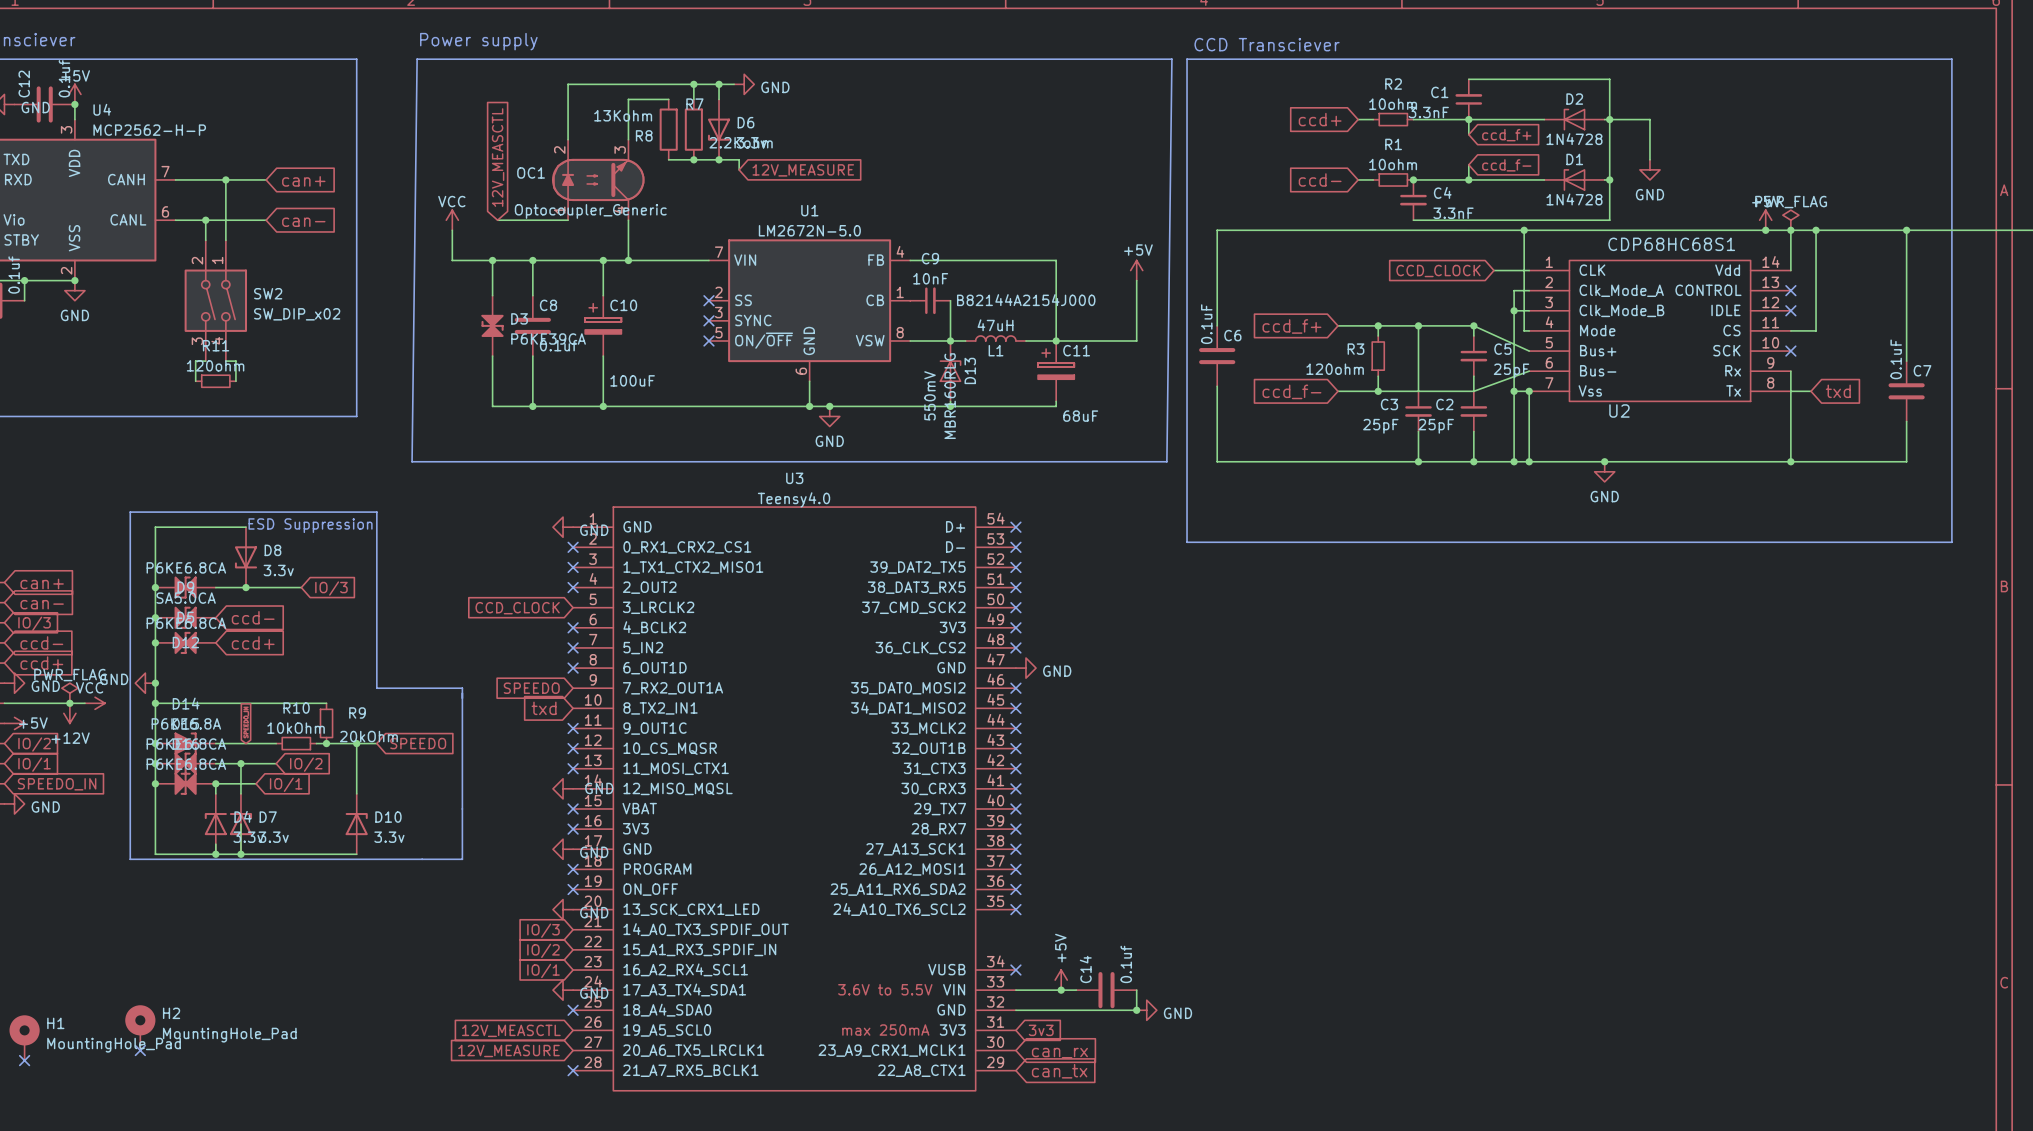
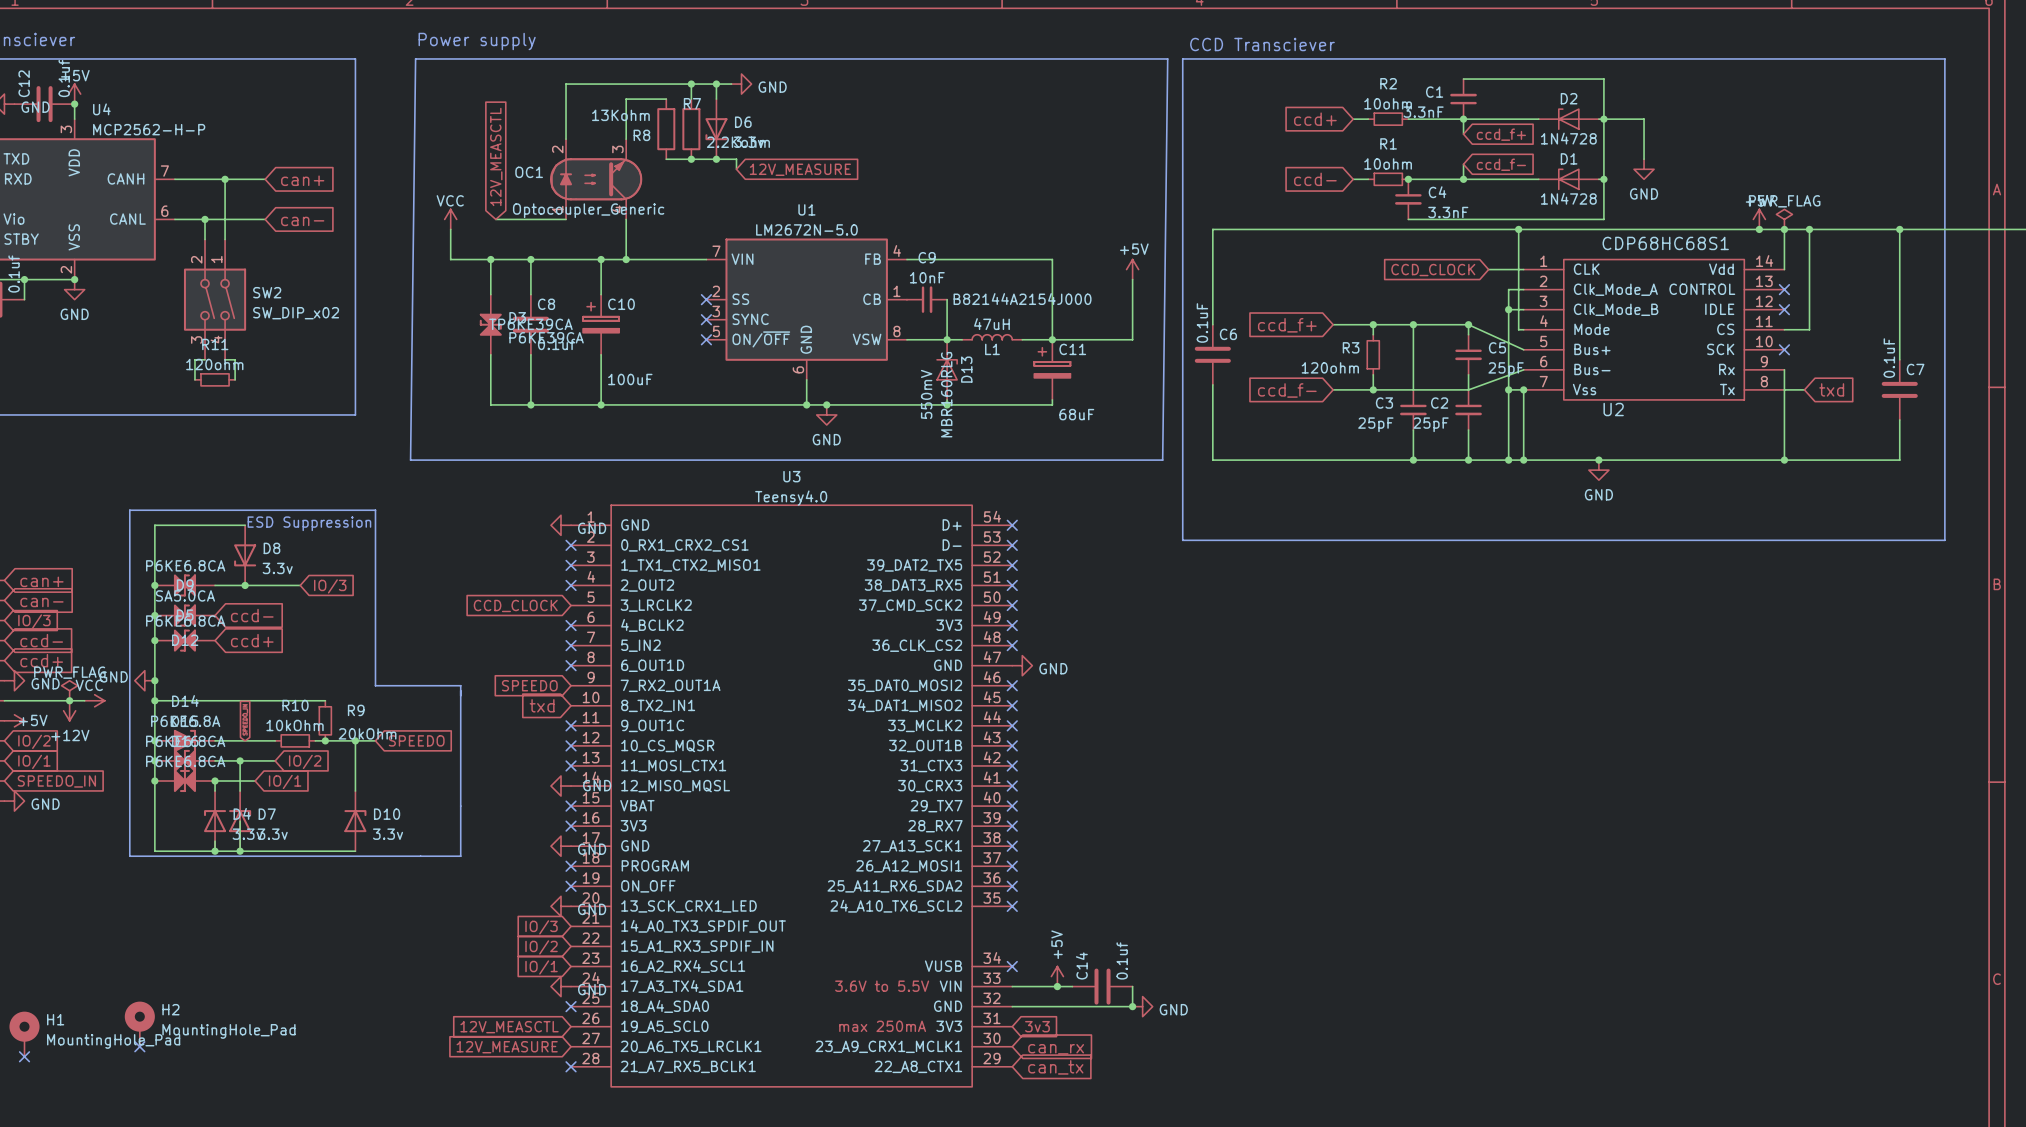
C8 text: none -> TP6KE39CA (530, 324)

